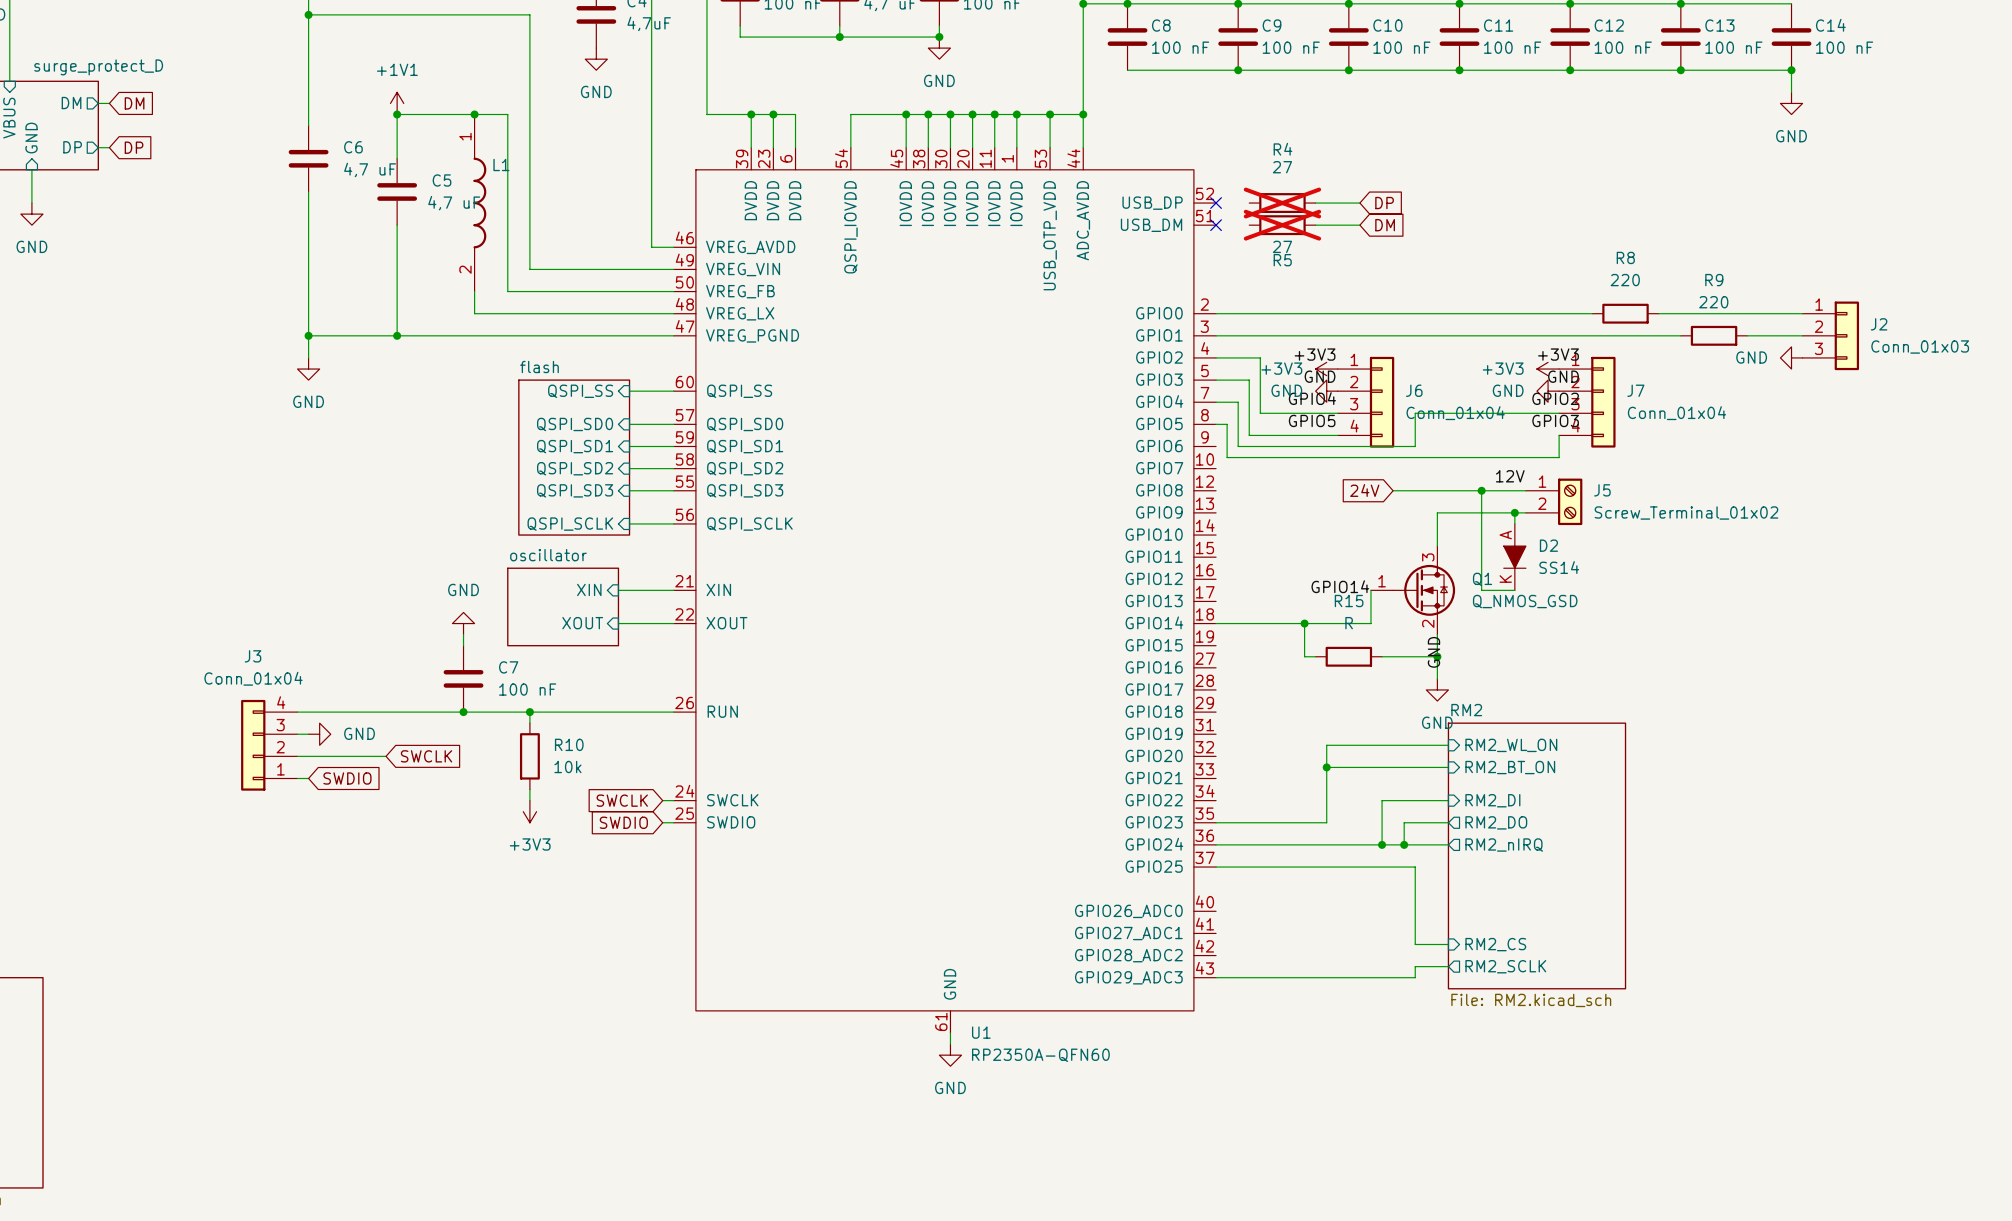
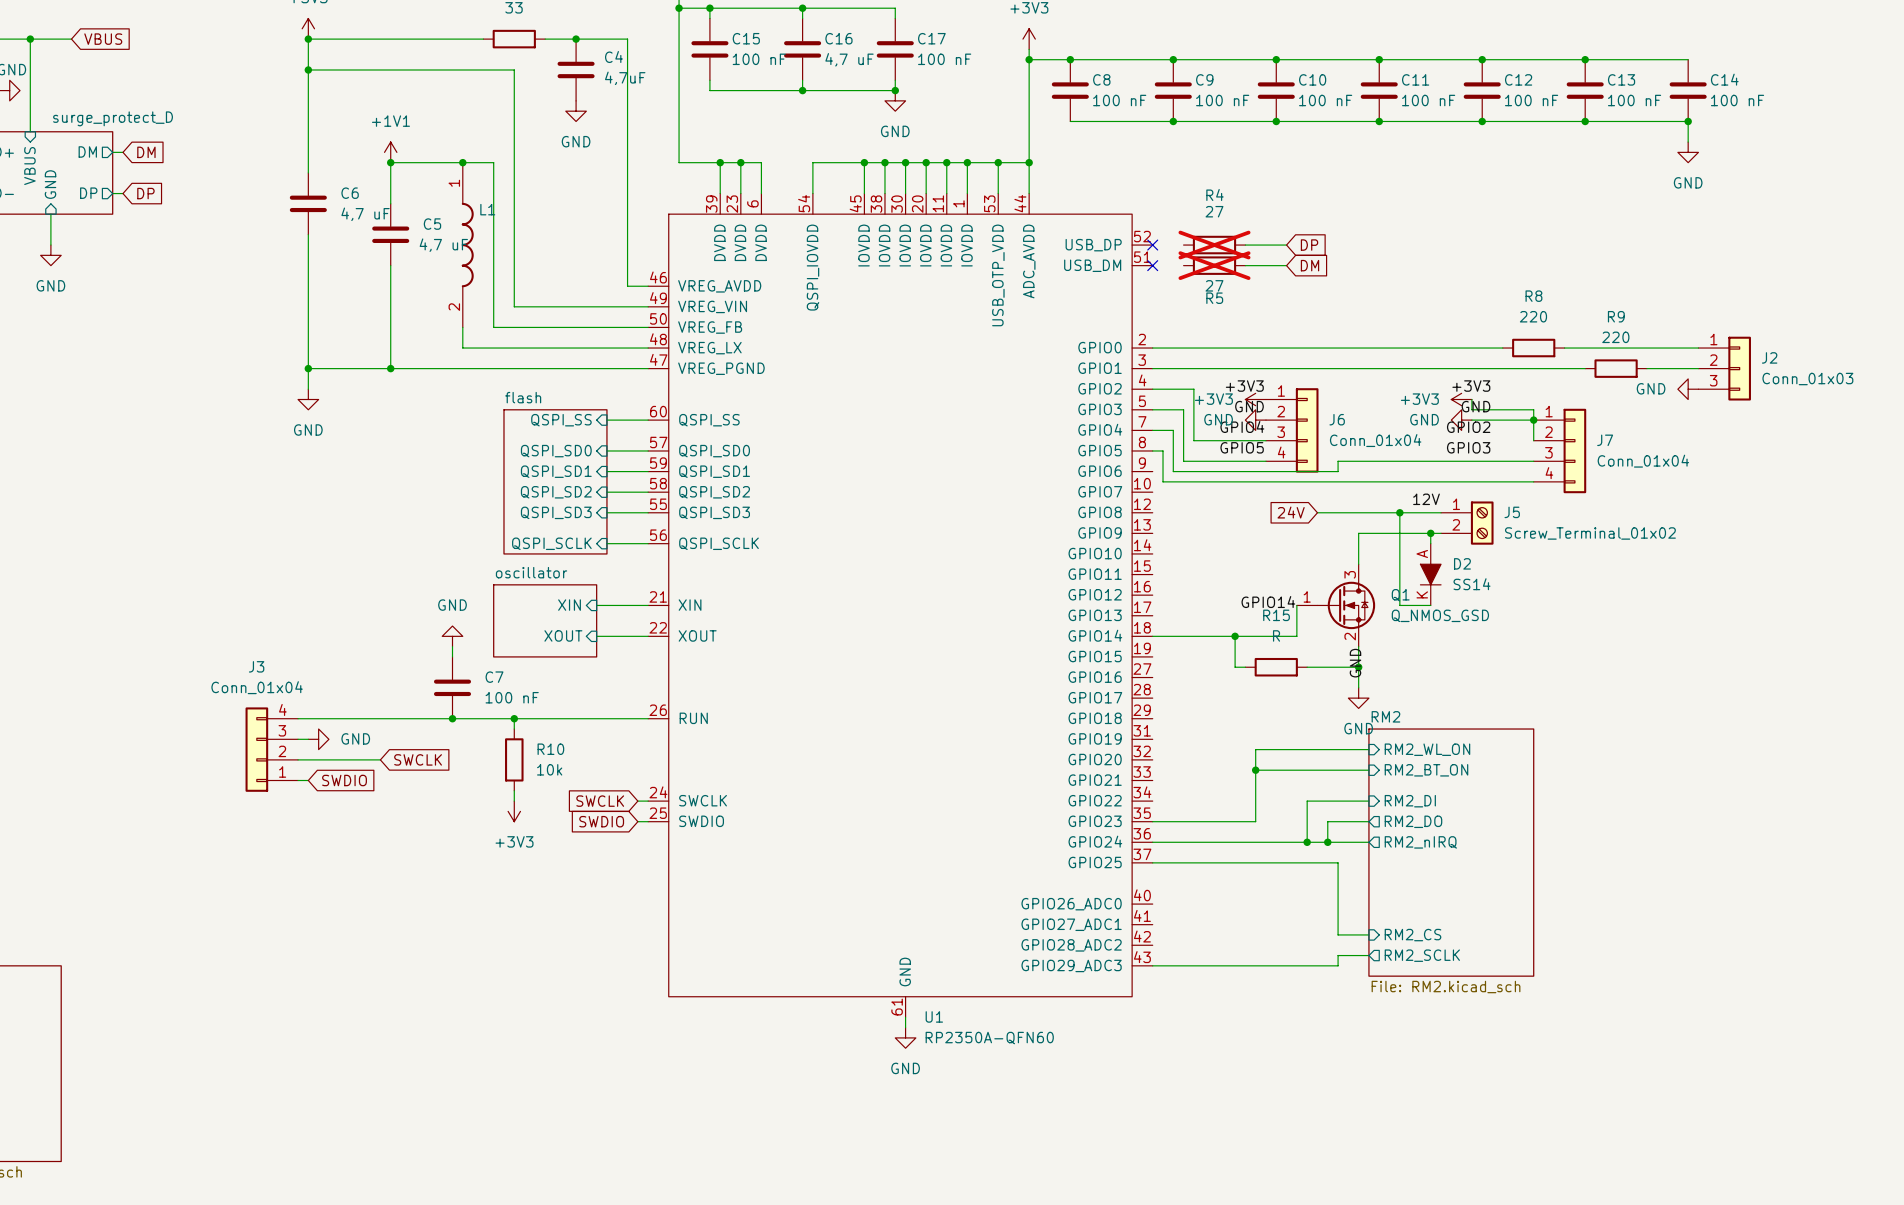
wire: none -> (1471, 399) (1471, 409) (1533, 409) (1533, 440)
junction: none -> (1533, 420)
J7 position: (1587, 402) -> (1559, 450)
wire: (1559, 413) (1415, 413) (1415, 435) -> (1533, 461) (1338, 461)
wire: (1559, 435) (1559, 457) -> (1533, 481) (1471, 481)

